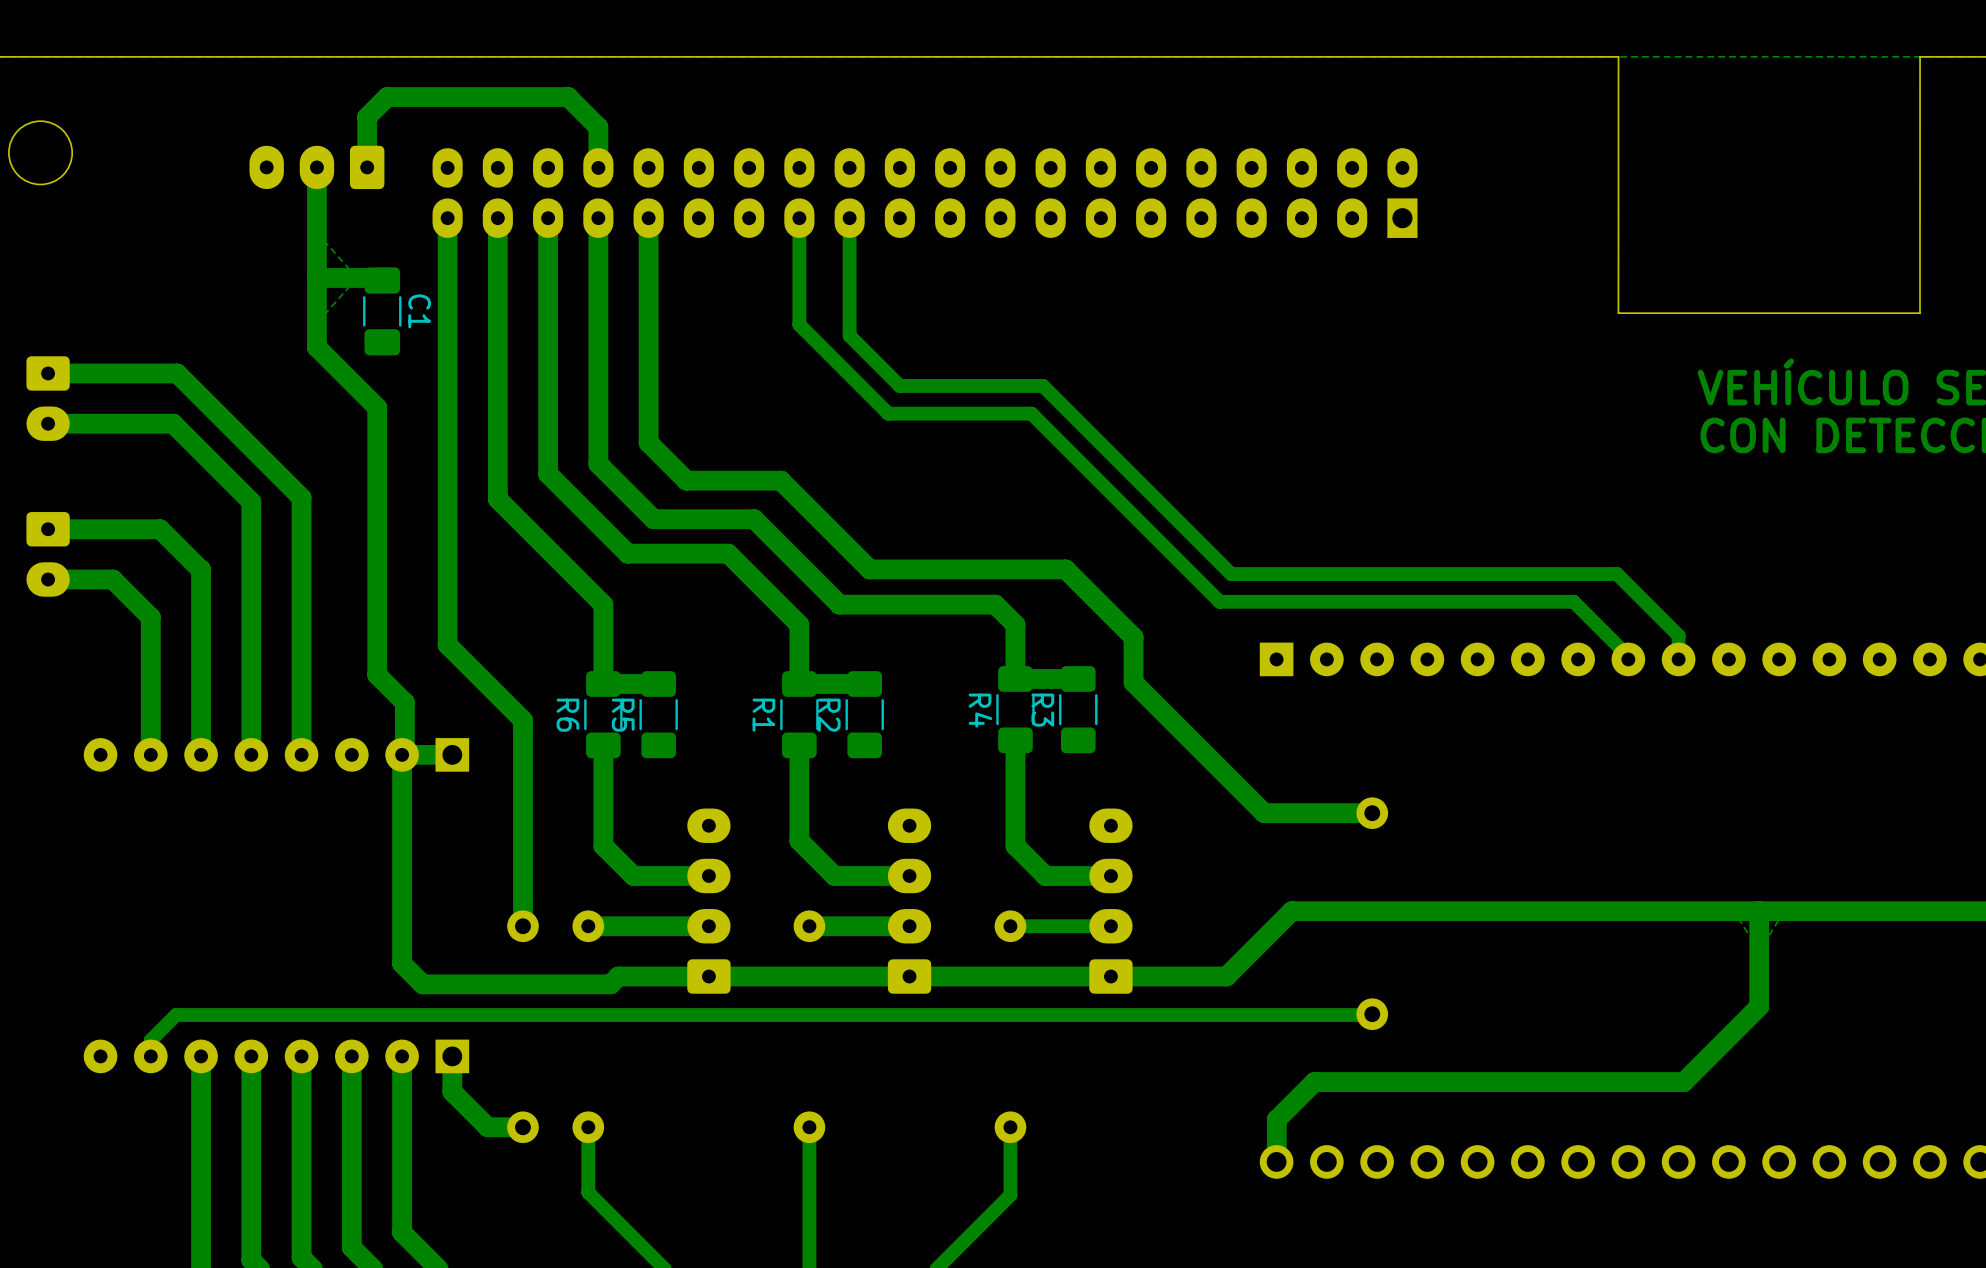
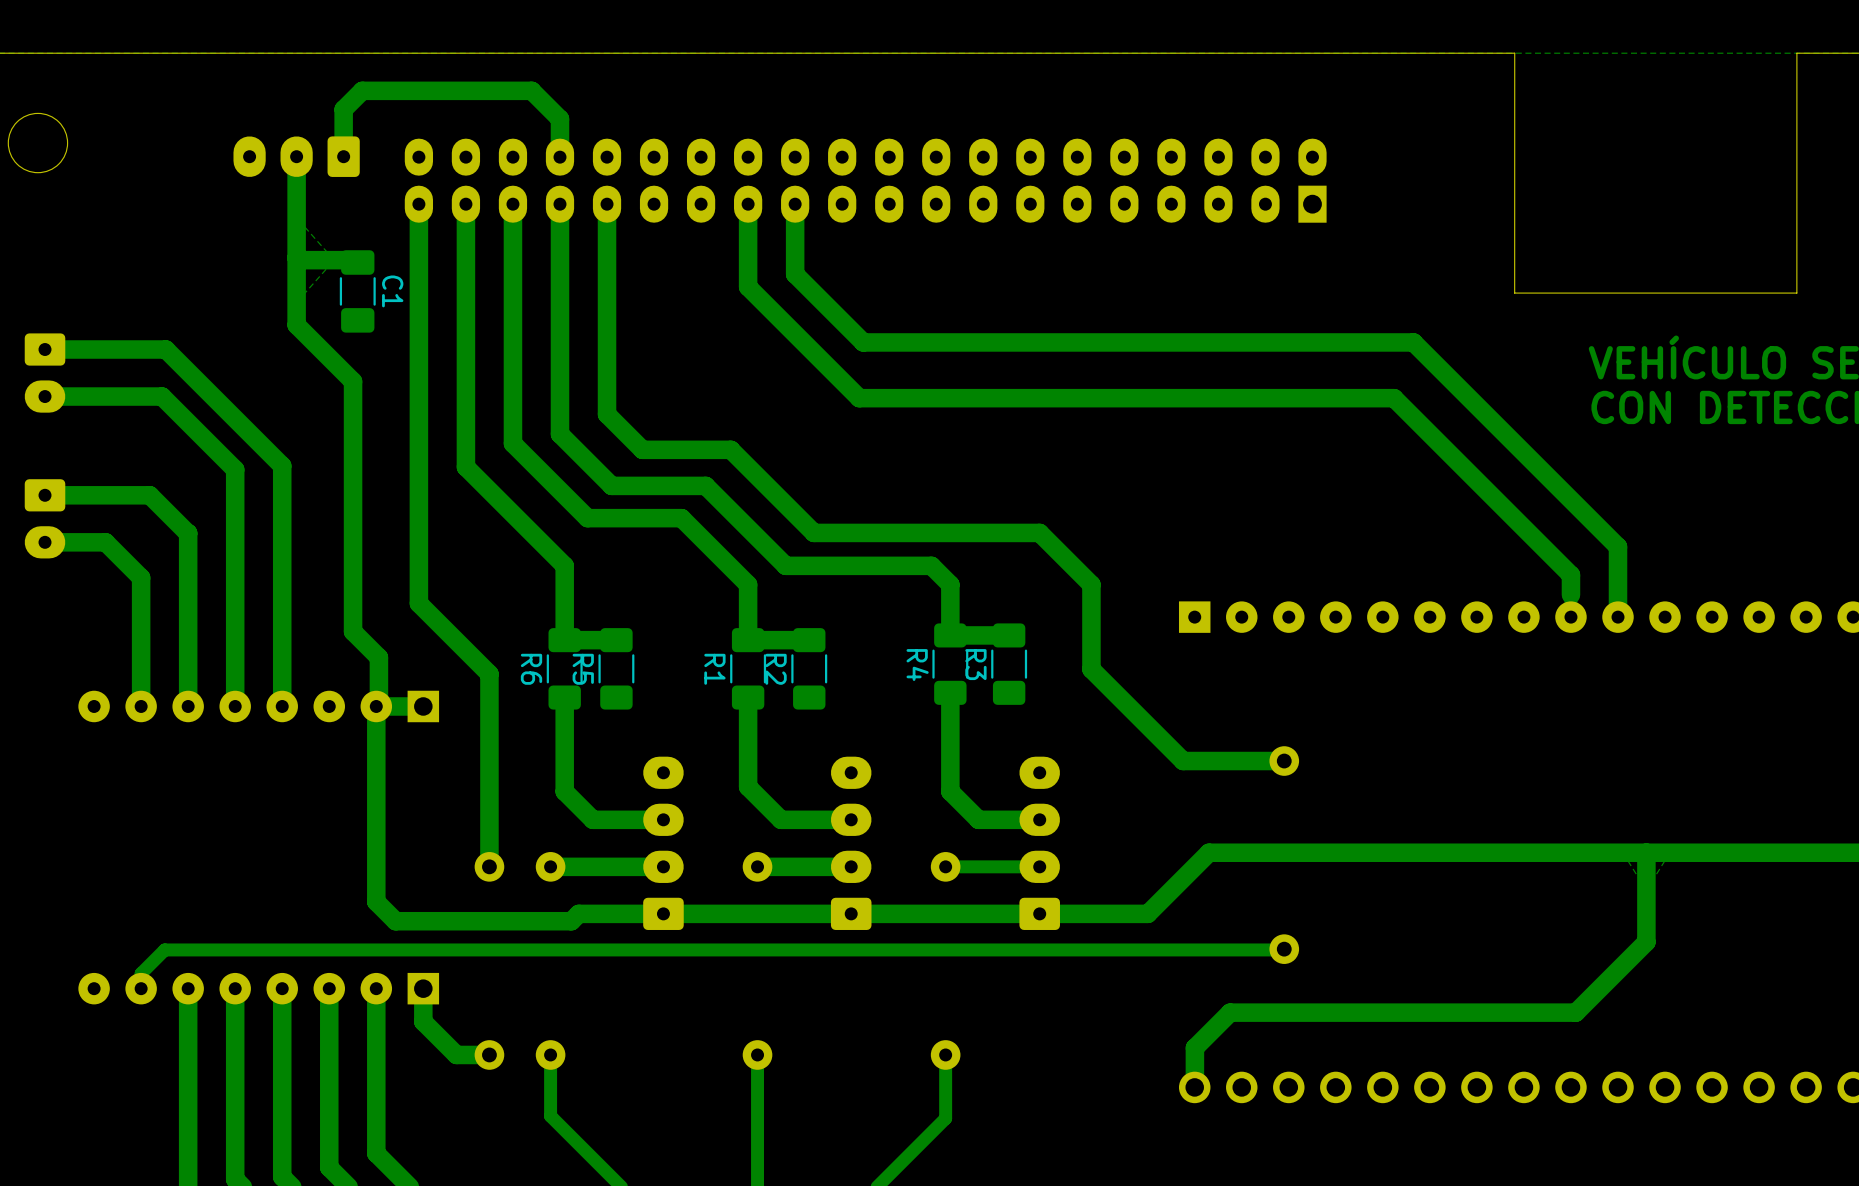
bottom track width: thin (799, 218) (799, 306) -> thick (748, 204) (748, 286)
bottom track width: thin (849, 218) (849, 293) -> thick (795, 204) (795, 274)
bottom track: (849, 293) (849, 335) (899, 385) (1043, 385) (1231, 574) (1617, 574) (1678, 635) -> (748, 286) (859, 398) (1394, 398) (1570, 575) (1570, 594)
bottom track: none -> (795, 274) (863, 342) (1413, 342) (1618, 546) (1618, 617)
bottom track: (799, 306) (799, 324) (888, 413) (1031, 413) (1219, 601) (1573, 601) (1628, 656) (1628, 659) -> none
bottom track: (1065, 569) (1133, 637) (1133, 682) (1166, 715) -> (997, 532) (1039, 532) (1091, 584) (1091, 669)

